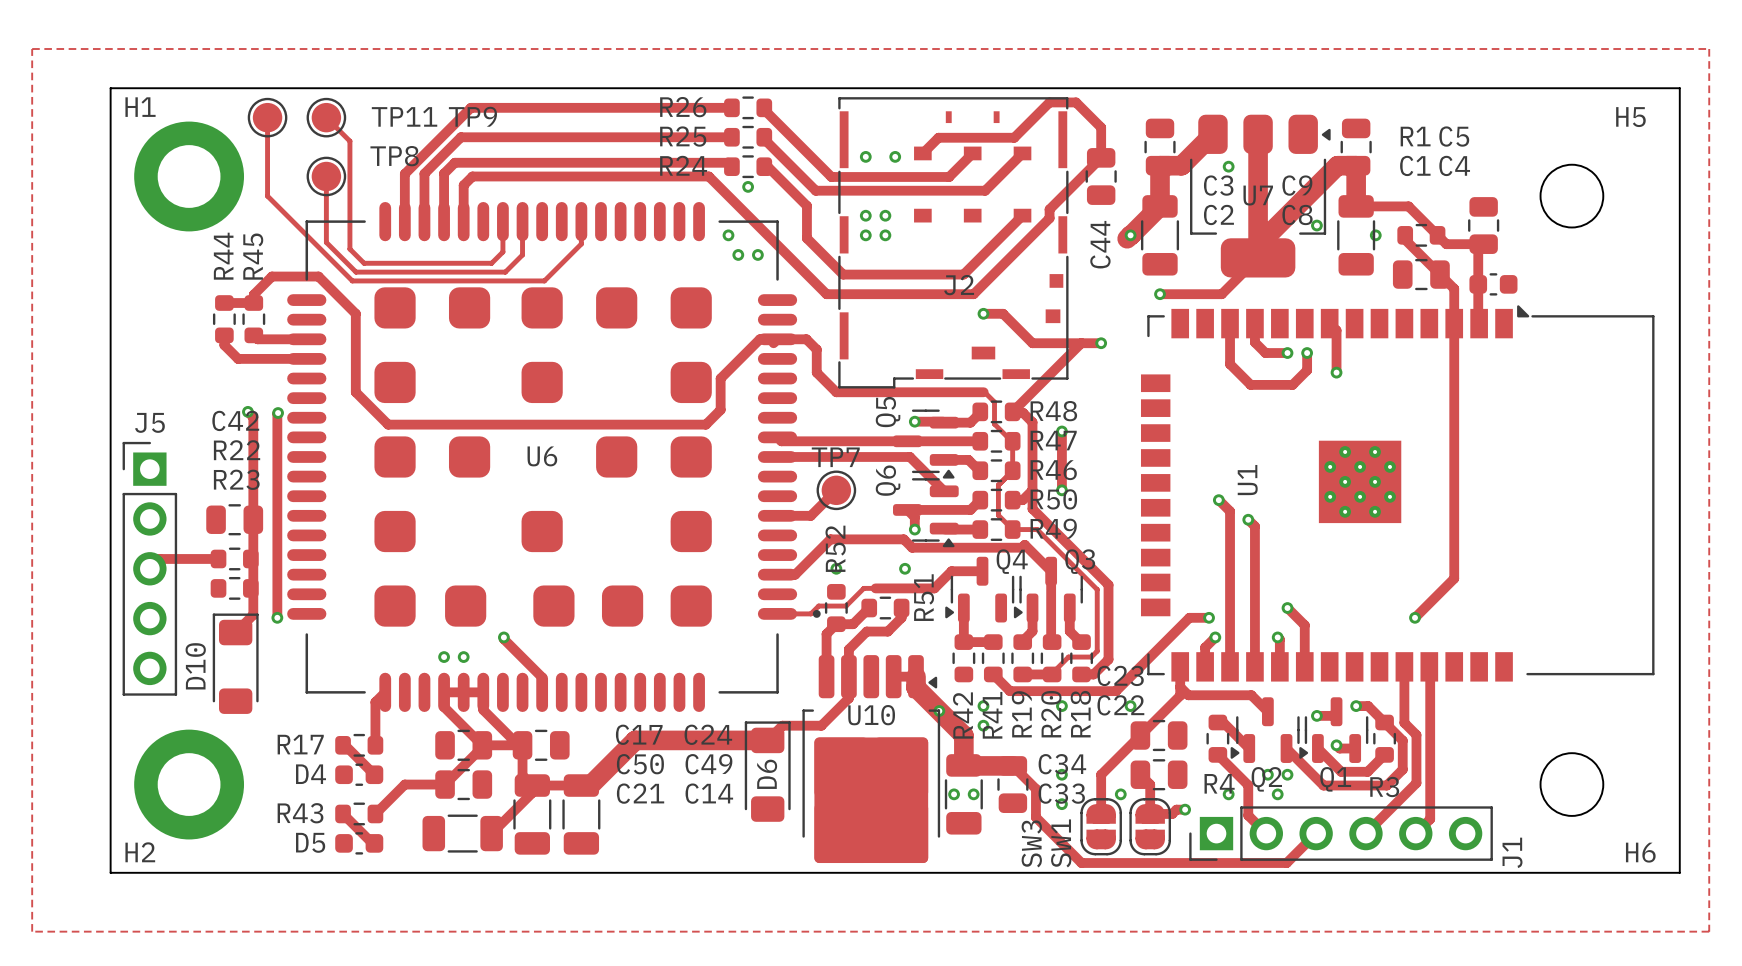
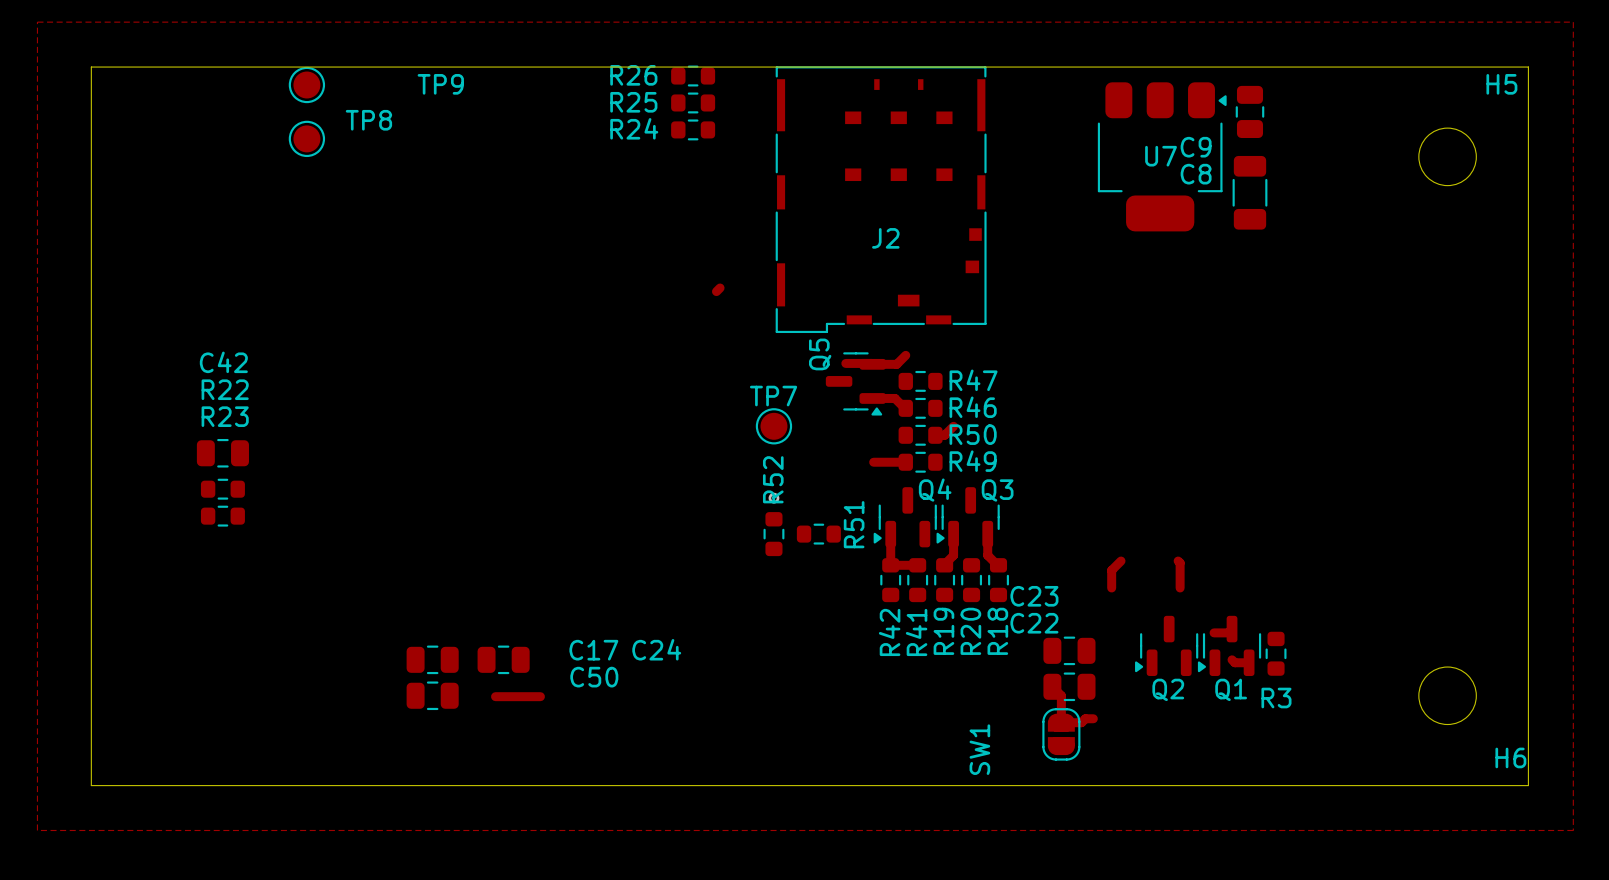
board edge: (110, 88) (1679, 88) (1679, 872) (110, 872) (110, 88) -> (91, 67) (1528, 67) (1528, 785) (91, 785) (91, 67)
track: (731, 107) (470, 107) (404, 173) (404, 221) -> none
track: (764, 109) (831, 176) (949, 176) (972, 153) -> none
track: (267, 117) (267, 196) (352, 280) (544, 280) (581, 244) (581, 233) -> none
TP11: (267, 117) -> none
track: (326, 117) (349, 141) (349, 249) (364, 263) (491, 263) (502, 252) (502, 221) -> none
track: (1212, 134) (1181, 165) (1160, 165) (1160, 206) (1127, 238) -> none
track: (1258, 134) (1258, 257) (1221, 294) (1160, 294) -> none
track: (731, 137) (460, 137) (424, 173) (424, 221) -> none
track: (764, 139) (815, 190) (985, 190) (1022, 153) -> none
C3: (1160, 147) -> none
track: (922, 153) (938, 137) (1014, 137) (1049, 102) (1076, 102) (1101, 127) (1101, 157) (1049, 209) (1049, 218) (973, 294) (826, 294) (708, 176) (472, 176) (463, 185) (463, 221) -> none
via: (865, 156) -> none
via: (895, 156) -> none
track: (731, 166) (728, 162) (454, 162) (444, 173) (444, 221) -> none
track: (764, 166) (767, 166) (806, 205) (806, 238) (843, 274) (963, 274) (1022, 215) -> none
via: (1228, 166) -> none
H1: (189, 176) -> none
track: (326, 176) (326, 242) (356, 272) (505, 272) (522, 254) (522, 221) -> none
C44: (1101, 176) -> none
via: (748, 186) -> none
via: (865, 215) -> none
via: (885, 215) -> none
via: (1316, 225) -> none
C5: (1483, 225) -> none
via: (728, 235) -> none
via: (865, 235) -> none
via: (885, 235) -> none
via: (1130, 235) -> none
C2: (1160, 235) -> none
via: (1375, 235) -> none
R1: (1421, 235) -> none
track: (1405, 239) (1454, 288) (1454, 578) (1415, 617) -> none
via: (738, 254) -> none
via: (757, 254) -> none
track: (1263, 257) (1263, 239) (1337, 165) (1356, 165) (1356, 206) (1408, 206) (1446, 244) (1483, 244) (1478, 249) (1479, 323) -> none
C1: (1421, 274) -> none
C4: (1493, 284) -> none
via: (1160, 294) -> none
track: (224, 303) (253, 303) (253, 294) (271, 276) (318, 276) (355, 313) (355, 392) (388, 424) (705, 424) (720, 409) (720, 378) (759, 339) (806, 339) (816, 349) (816, 372) (836, 392) (984, 392) (994, 402) (994, 424) (1012, 442) (1012, 470) (998, 485) (998, 515) (1012, 529) (1037, 529) (1097, 589) (1097, 651) (1091, 657) (1068, 657) (1051, 674) (1021, 674) -> none
track: (983, 313) (1003, 313) (1032, 343) (1101, 343) -> none
via: (983, 313) -> none
R44: (224, 319) -> none
R45: (253, 319) -> none
track: (1230, 323) (1230, 364) (1250, 384) (1292, 384) (1307, 370) (1307, 353) -> none
track: (1254, 323) (1254, 342) (1265, 353) (1287, 353) -> none
track: (1329, 323) (1336, 330) (1336, 372) -> none
track: (224, 335) (224, 345) (238, 358) (306, 358) -> none
track: (253, 335) (257, 339) (306, 339) -> none
track: (1081, 343) (1012, 411) -> none
via: (1101, 343) -> none
via: (1287, 353) -> none
via: (1307, 353) -> none
via: (1336, 372) -> none
track: (247, 411) (253, 417) (253, 614) (235, 632) -> none
via: (247, 411) -> none
R48: (996, 411) -> none
track: (1012, 412) (1023, 412) (1032, 422) (1032, 508) (1108, 584) (1108, 659) (1093, 674) (1080, 674) -> none
track: (278, 413) (277, 617) -> none
via: (278, 413) -> none
via: (914, 421) -> none
track: (1061, 431) (1061, 490) -> none
via: (1061, 431) -> none
track: (777, 437) (781, 441) (979, 441) -> none
U6: (553, 456) -> none
track: (777, 456) (909, 456) (944, 491) -> none
track: (836, 490) (810, 515) (777, 515) -> none
via: (1061, 490) -> none
U1: (1397, 493) -> none
track: (980, 500) (970, 509) (907, 509) (914, 517) (914, 529) -> none
track: (1218, 500) (1230, 511) (1230, 666) -> none
via: (1218, 500) -> none
Q6: (925, 512) -> none
track: (1248, 519) (1254, 526) (1254, 666) -> none
via: (1248, 519) -> none
via: (914, 529) -> none
track: (218, 558) (159, 558) (149, 568) -> none
J5: (149, 568) -> none
via: (905, 568) -> none
track: (982, 571) (951, 571) (934, 588) (863, 588) (846, 606) (818, 606) (810, 613) (777, 613) -> none
track: (777, 574) (795, 574) (830, 539) (903, 539) (912, 547) (1021, 547) (1024, 544) (1051, 571) (1051, 642) -> none
track: (869, 608) (853, 624) (836, 624) (826, 634) (826, 676) -> none
track: (901, 608) (901, 617) (887, 631) (866, 631) (848, 649) (848, 698) (821, 725) (782, 725) (767, 740) (635, 740) (590, 785) -> none
track: (1287, 608) (1304, 625) (1304, 666) -> none
via: (1287, 608) -> none
via: (277, 617) -> none
track: (1209, 617) (1189, 617) (1116, 691) (1009, 691) (993, 674) -> none
via: (1209, 617) -> none
via: (1415, 617) -> none
track: (503, 637) (542, 677) (542, 692) -> none
via: (503, 637) -> none
via: (1215, 637) -> none
via: (1277, 637) -> none
via: (444, 657) -> none
via: (463, 657) -> none
D10: (235, 663) -> none
track: (1180, 666) (1180, 695) (1101, 774) (1101, 813) -> none
track: (1404, 666) (1404, 722) (1416, 734) (1416, 783) (1365, 833) -> none
track: (1430, 667) (1430, 819) (1415, 833) -> none
track: (893, 676) (916, 676) (916, 687) (963, 735) (963, 765) -> none
track: (1180, 687) (1188, 695) (1251, 695) (1267, 711) -> none
track: (385, 692) (375, 702) (375, 745) -> none
via: (983, 706) -> none
via: (1061, 706) -> none
via: (1130, 706) -> none
track: (1356, 706) (1368, 706) (1402, 740) (1402, 769) (1386, 785) (1323, 785) (1286, 748) -> none
via: (1356, 706) -> none
via: (939, 710) -> none
via: (1316, 715) -> none
track: (1217, 722) (1223, 722) (1249, 748) -> none
via: (983, 725) -> none
R4: (1217, 738) -> none
track: (345, 745) (374, 774) -> none
R17: (359, 745) -> none
track: (518, 745) (483, 710) (483, 692) (444, 692) (444, 707) (482, 745) (522, 745) (522, 775) (532, 785) (532, 792) (491, 833) -> none
via: (1336, 745) -> none
track: (482, 747) (445, 784) (404, 784) (375, 813) -> none
track: (1317, 748) (1341, 771) (1367, 771) (1384, 754) -> none
track: (1217, 754) (1248, 785) (1248, 815) (1266, 833) -> none
U10: (871, 759) -> none
track: (964, 765) (1012, 765) (1035, 788) (1035, 817) (1081, 863) (1286, 863) (1316, 833) -> none
D6: (767, 771) -> none
D4: (359, 774) -> none
via: (1061, 774) -> none
via: (1267, 774) -> none
via: (1287, 774) -> none
H2: (189, 784) -> none
C34: (1012, 784) -> none
via: (954, 794) -> none
C33: (963, 794) -> none
via: (973, 794) -> none
via: (1120, 794) -> none
via: (1228, 794) -> none
via: (1277, 794) -> none
via: (1061, 804) -> none
via: (1185, 809) -> none
track: (343, 813) (372, 843) -> none
R43: (359, 813) -> none
C14: (532, 814) -> none
C49: (581, 814) -> none
SW3: (1101, 826) -> none
C21: (462, 833) -> none
J1: (1341, 833) -> none
D5: (359, 843) -> none

